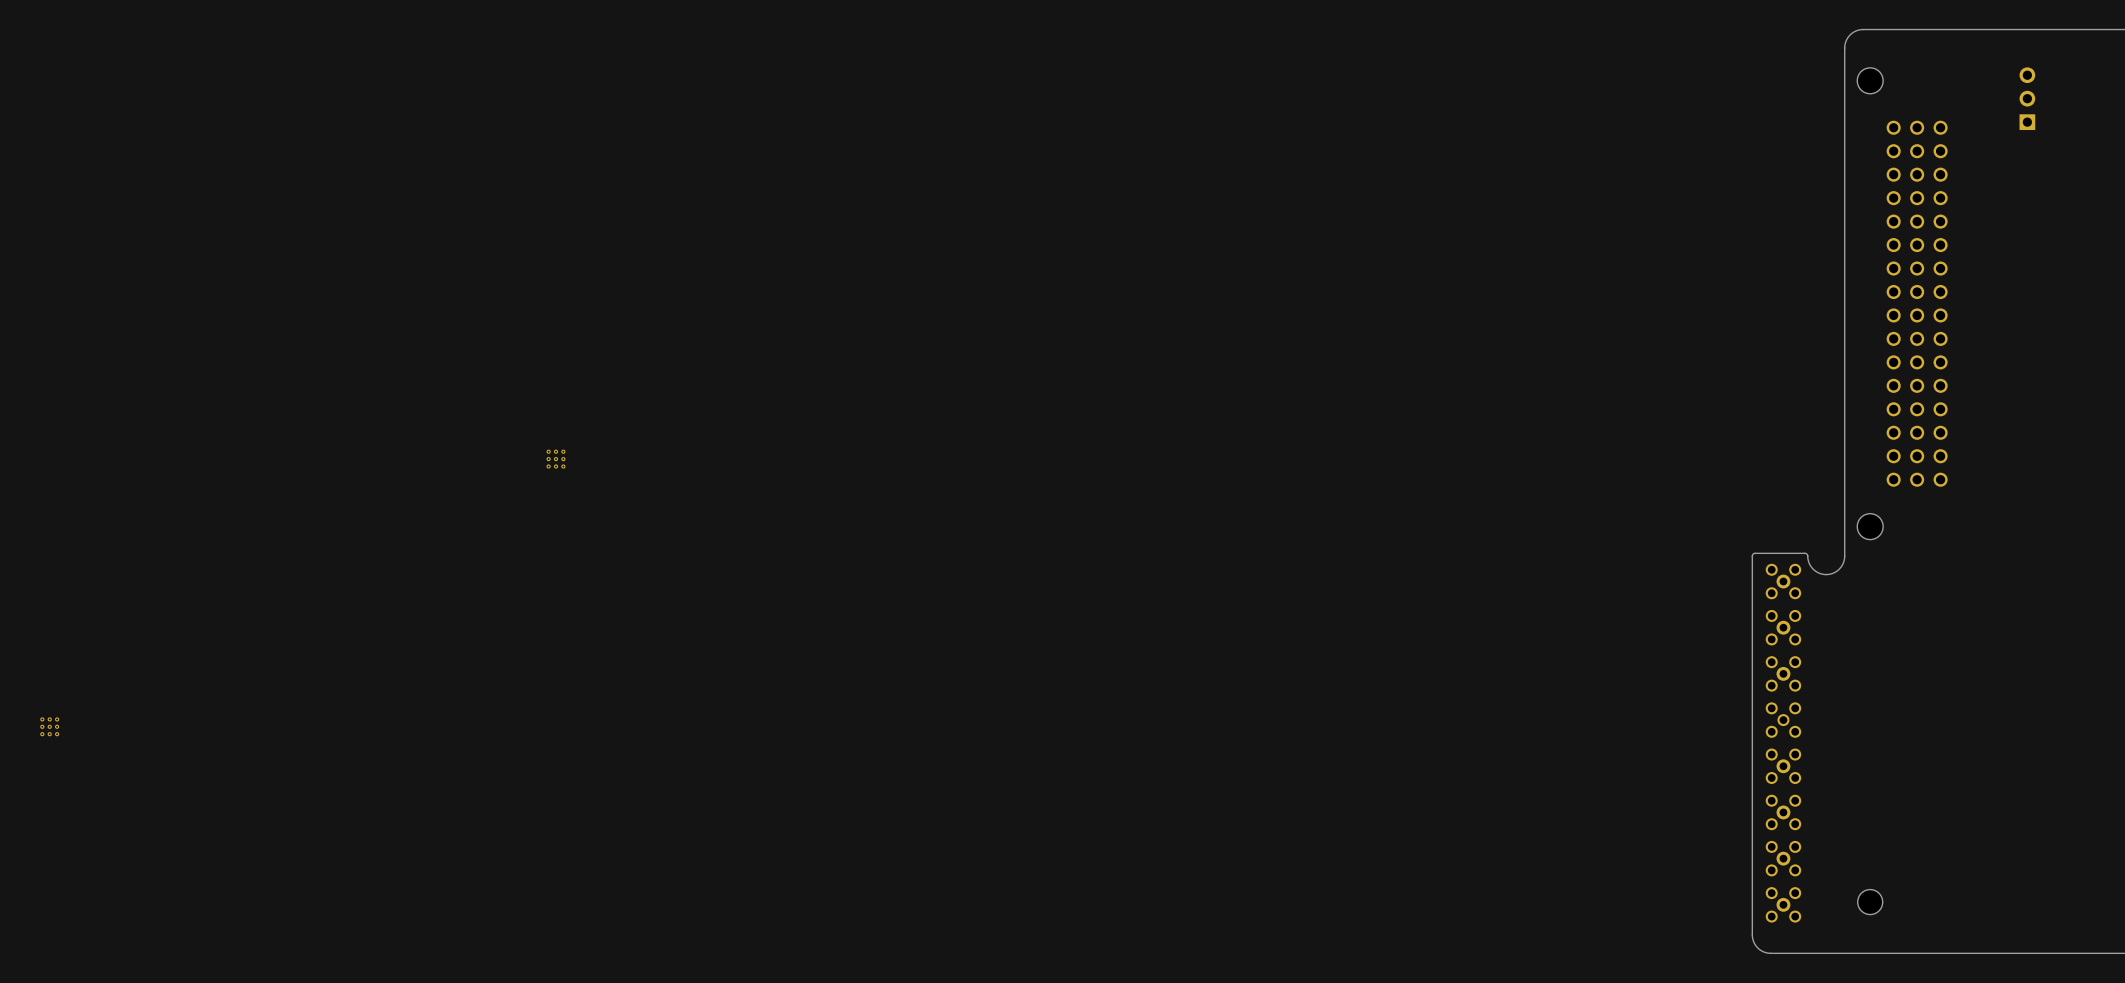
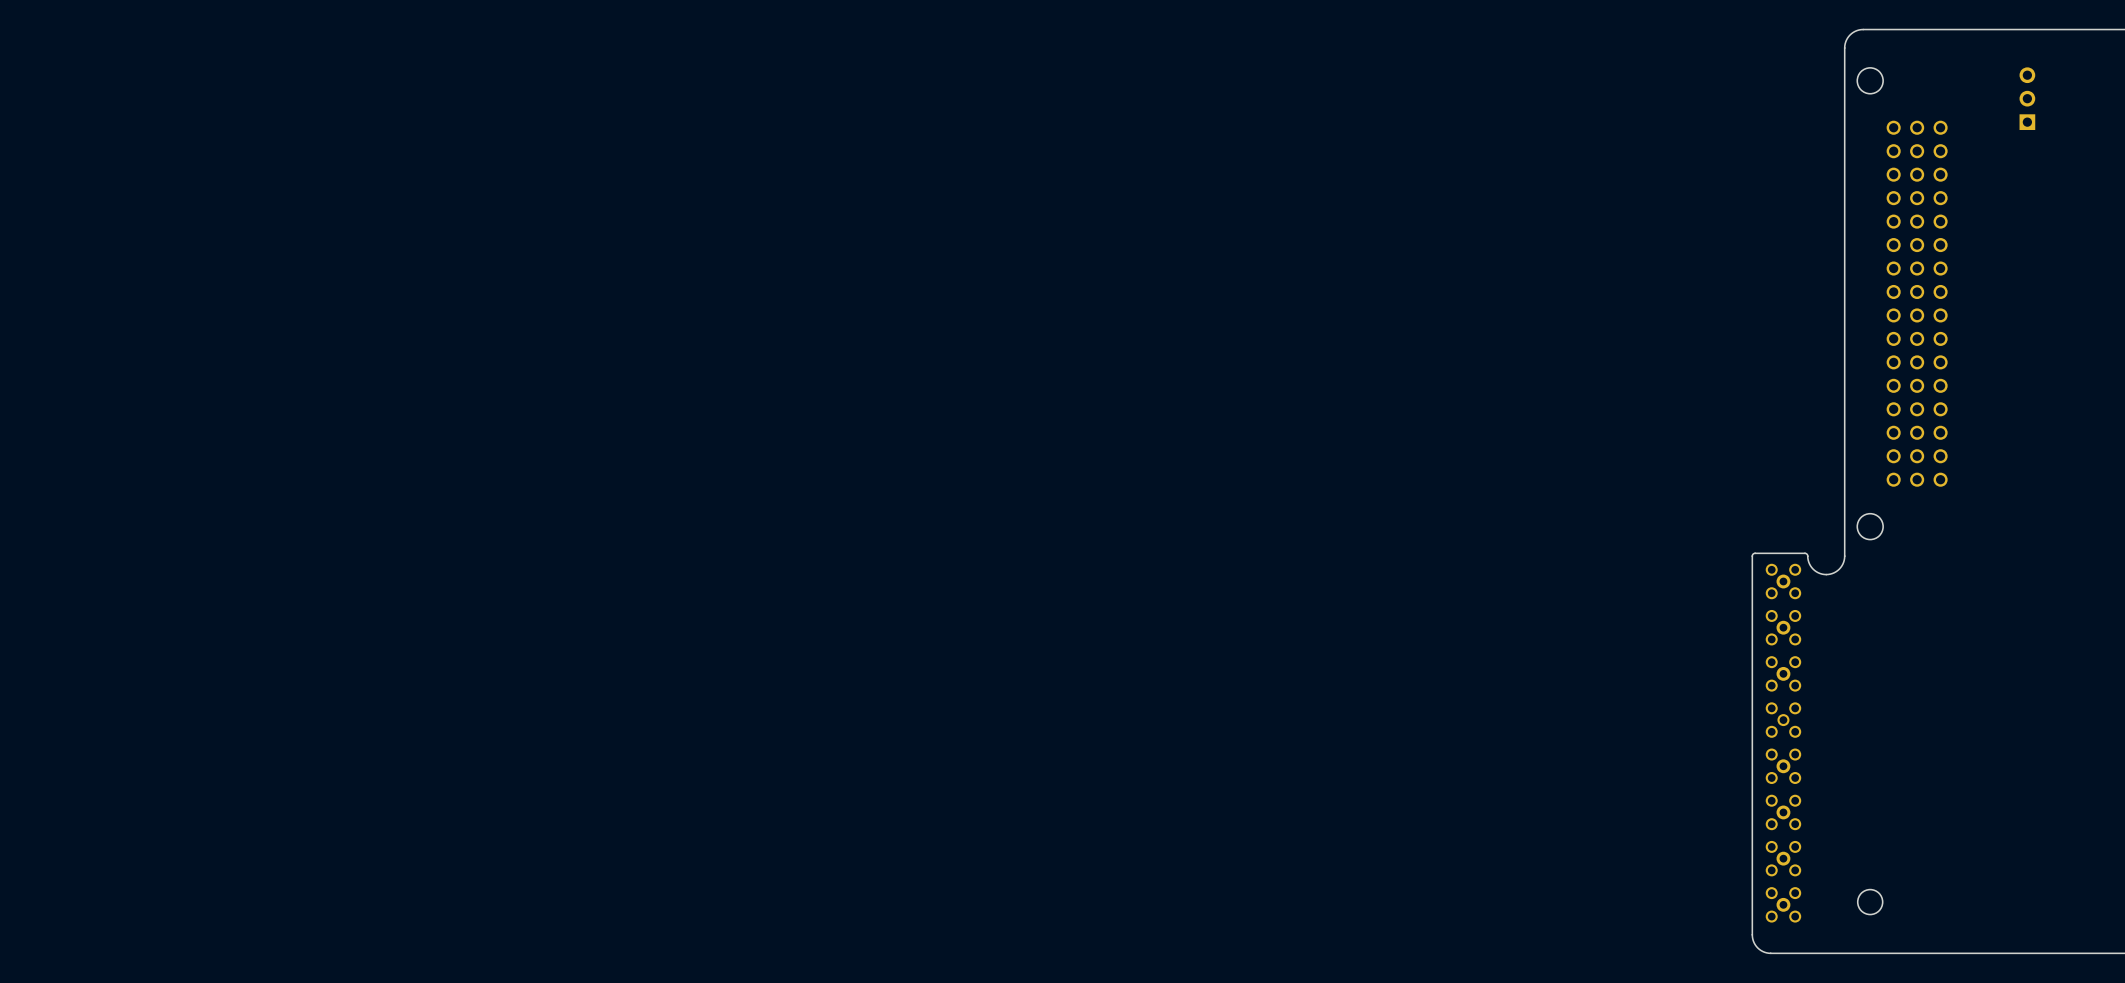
part: (556, 459) -> none
part: (49, 726) -> none

